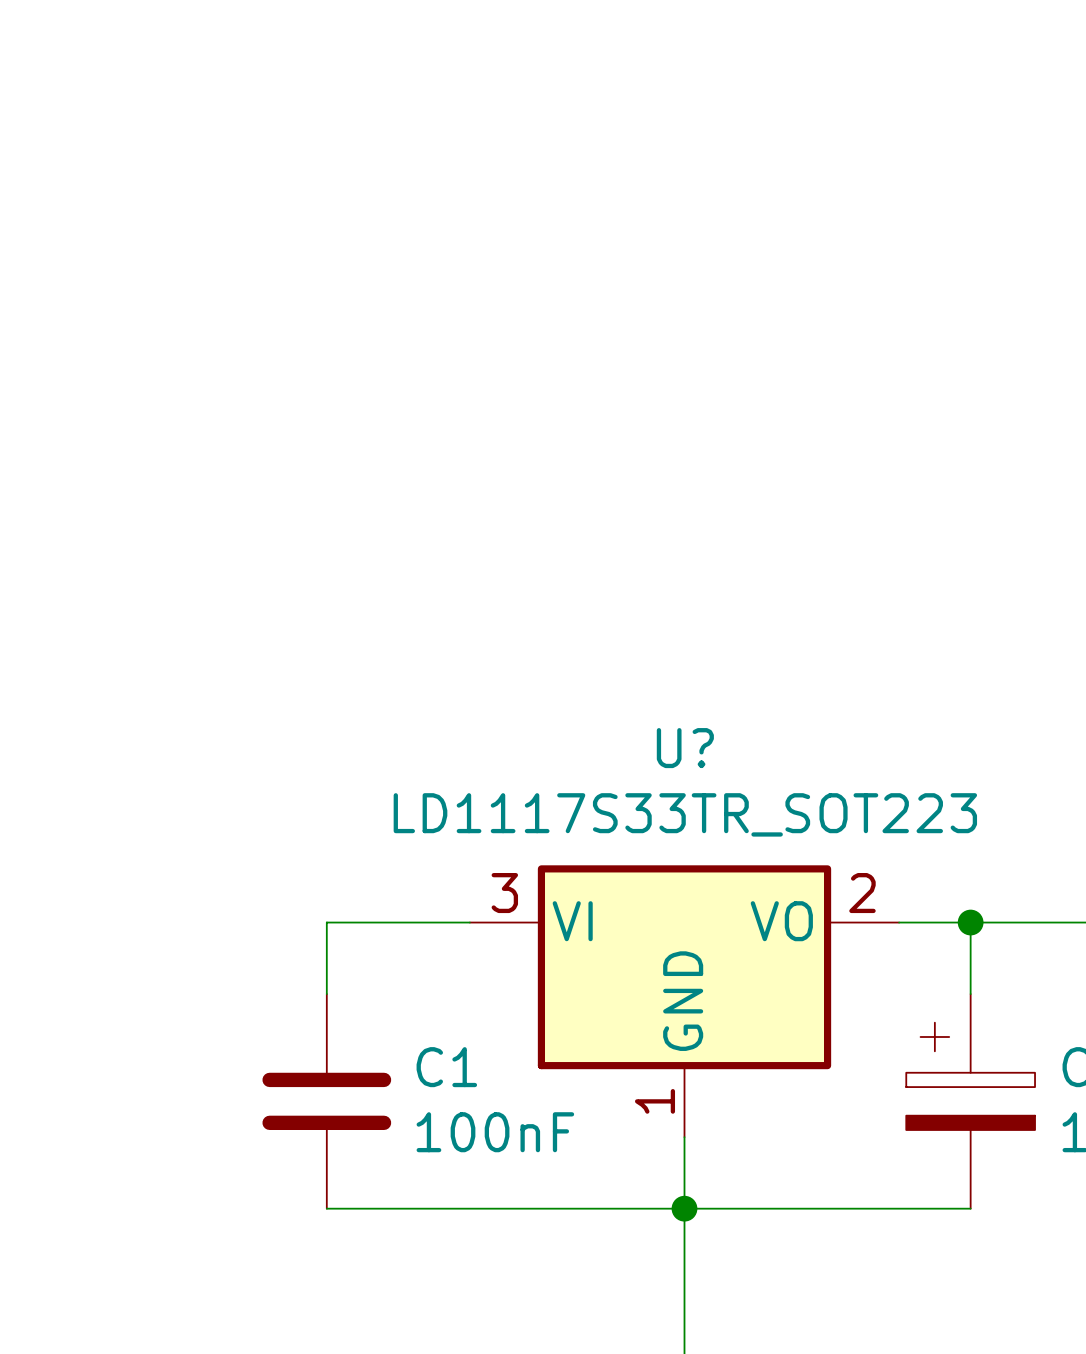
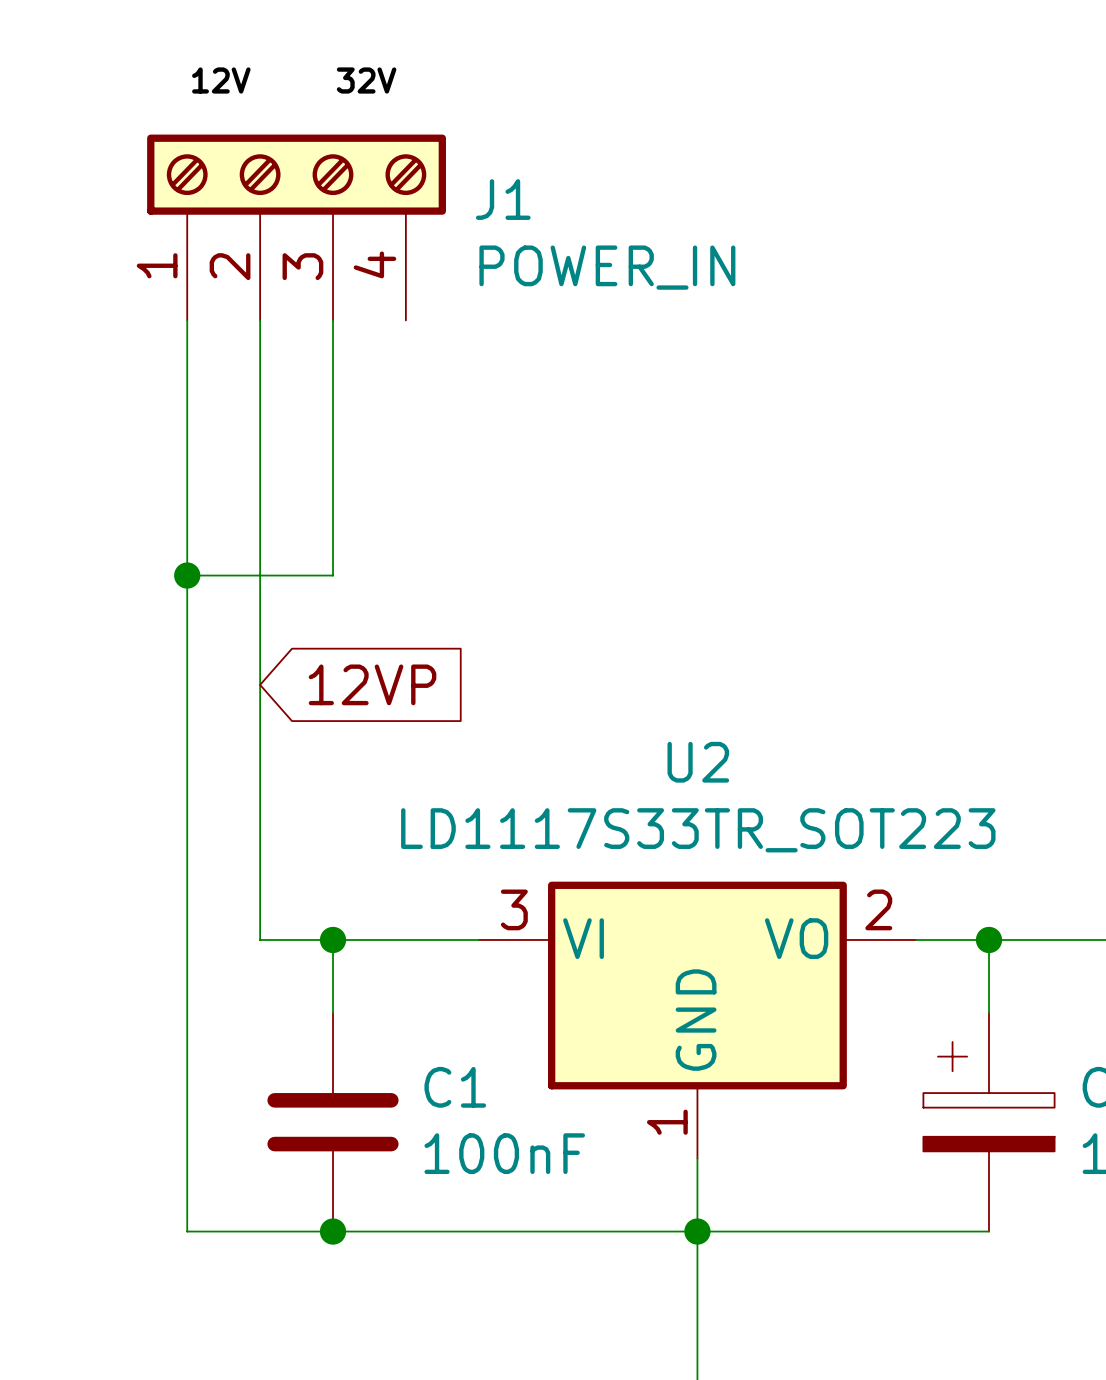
label: none -> 12V (221, 80)
label: none -> 32V (366, 80)
J1: none -> POWER_IN (296, 227)
wire: none -> (187, 320) (187, 1231) (333, 1231)
wire: none -> (260, 320) (260, 939) (333, 939)
wire: none -> (333, 320) (333, 575) (187, 575)
junction: none -> (187, 575)
global label: none -> 12VP (372, 684)
U? name: U? (685, 748) -> U2 (698, 762)
junction: none -> (333, 939)
junction: none -> (333, 1231)

